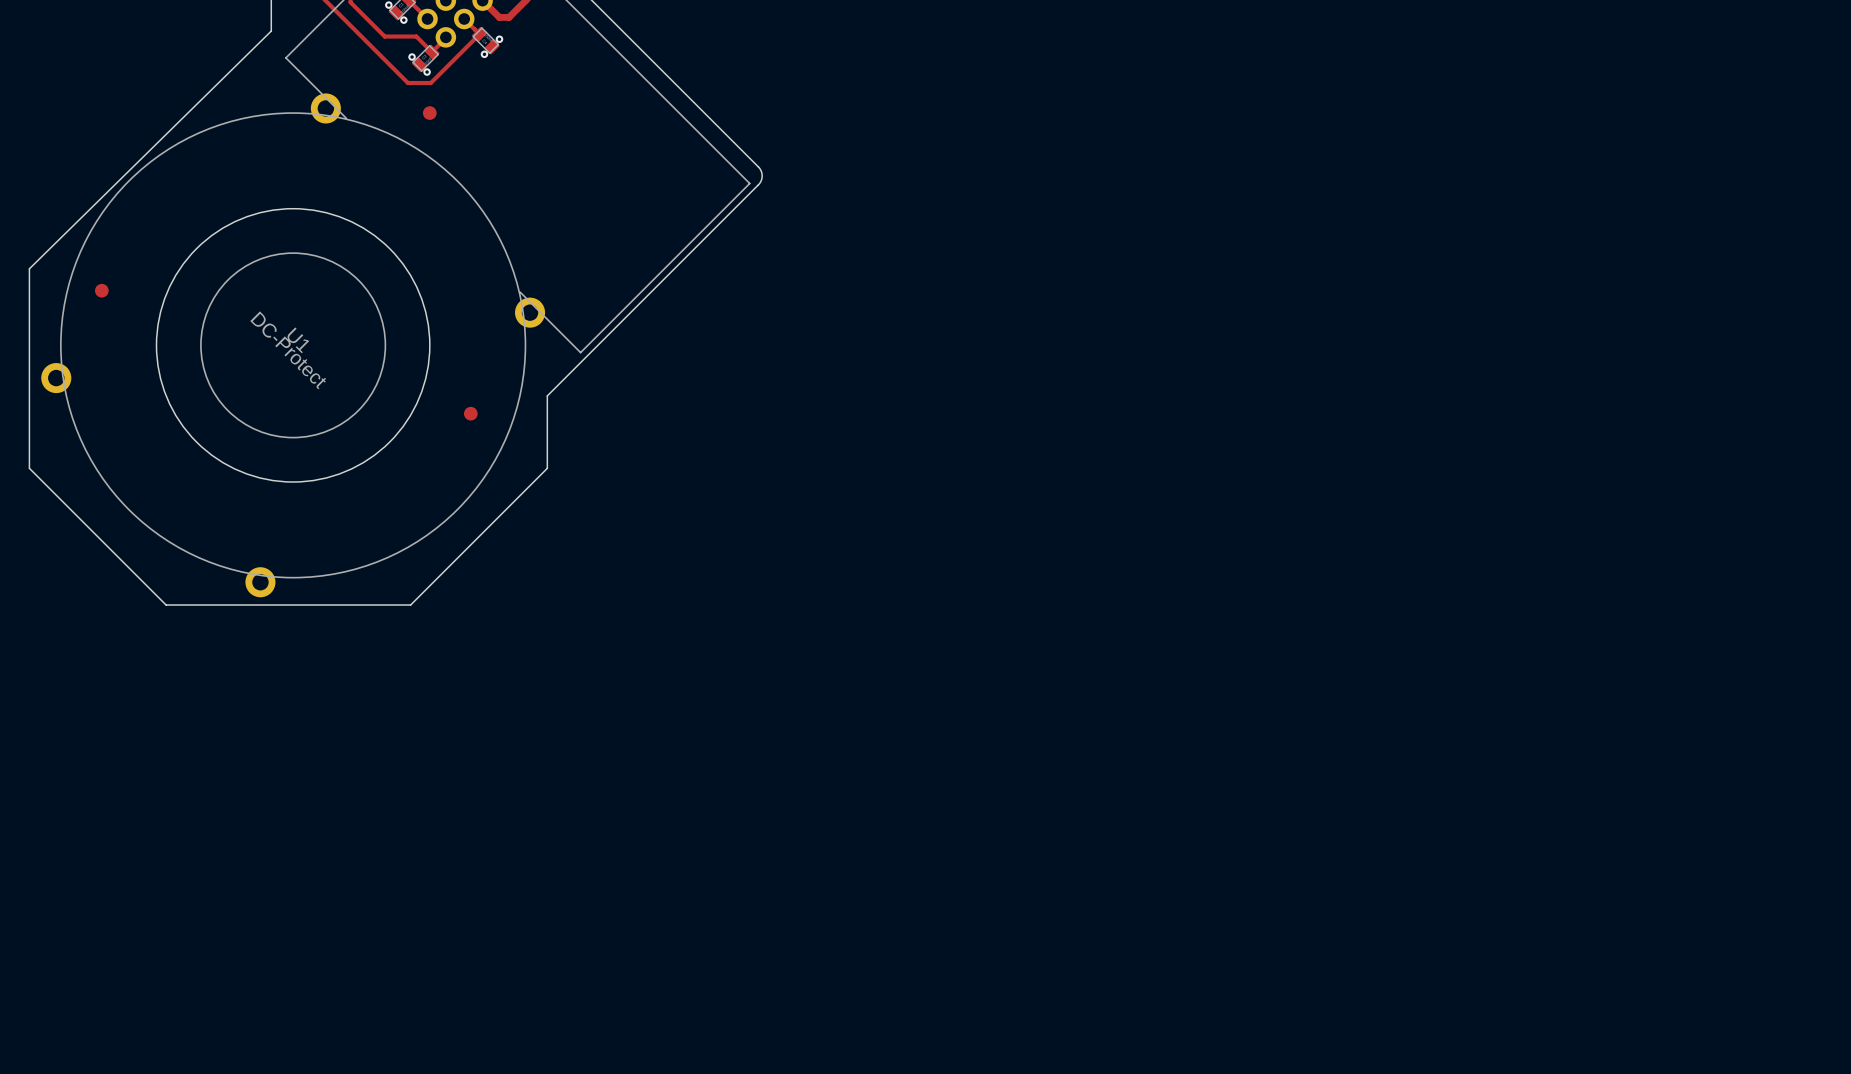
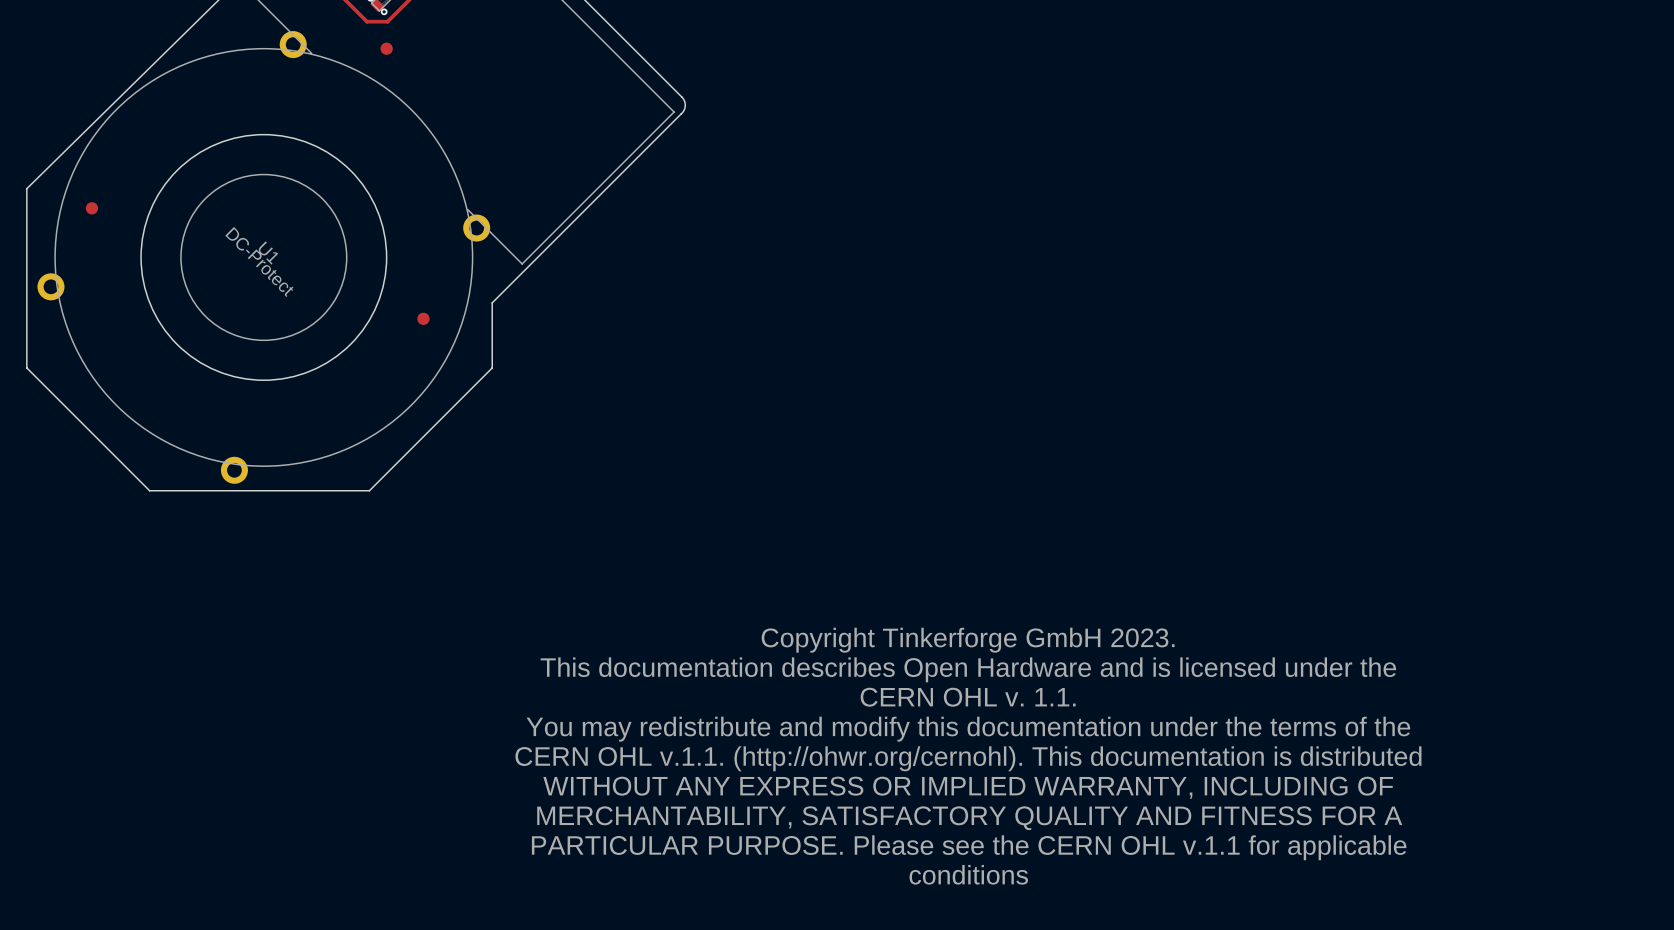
text: none -> Copyright Tinkerforge GmbH 2023. (968, 640)
text: none -> This documentation describes Open Hardware and is licensed under the (968, 669)
text: none -> CERN OHL v. 1.1. (968, 697)
text: none -> You may redistribute and modify this documentation under the terms of the (968, 729)
text: none -> CERN OHL v.1.1. (http://ohwr.org/cernohl). This documentation is distributed (968, 758)
text: none -> WITHOUT ANY EXPRESS OR IMPLIED WARRANTY, INCLUDING OF (968, 787)
text: none -> MERCHANTABILITY, SATISFACTORY QUALITY AND FITNESS FOR A (969, 818)
text: none -> PARTICULAR PURPOSE. Please see the CERN OHL v.1.1 for applicable (969, 847)
text: none -> conditions (968, 874)

